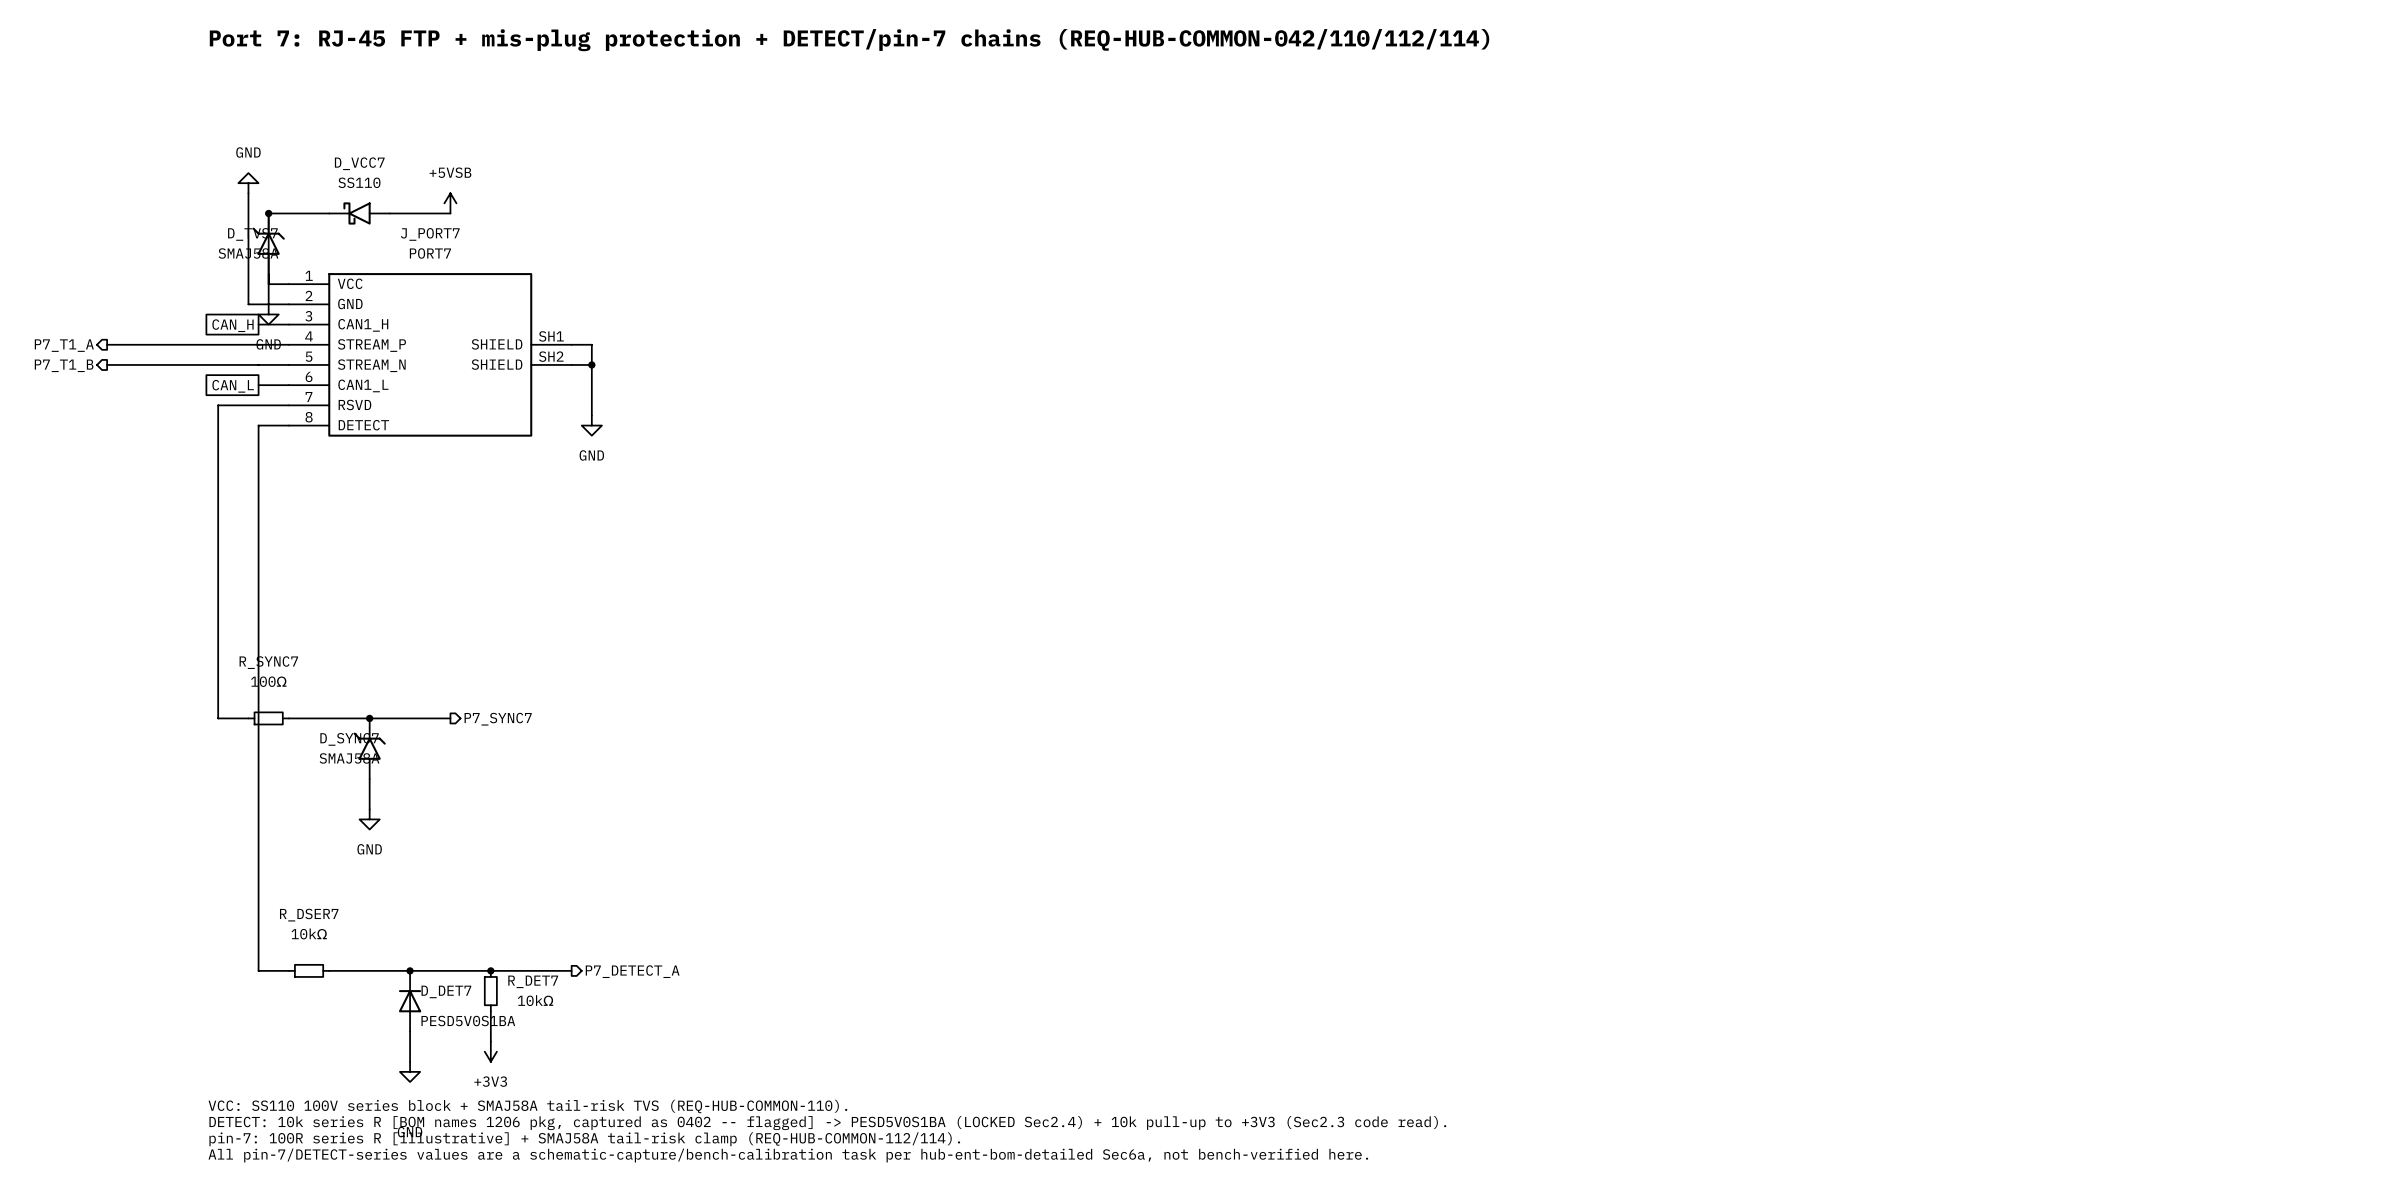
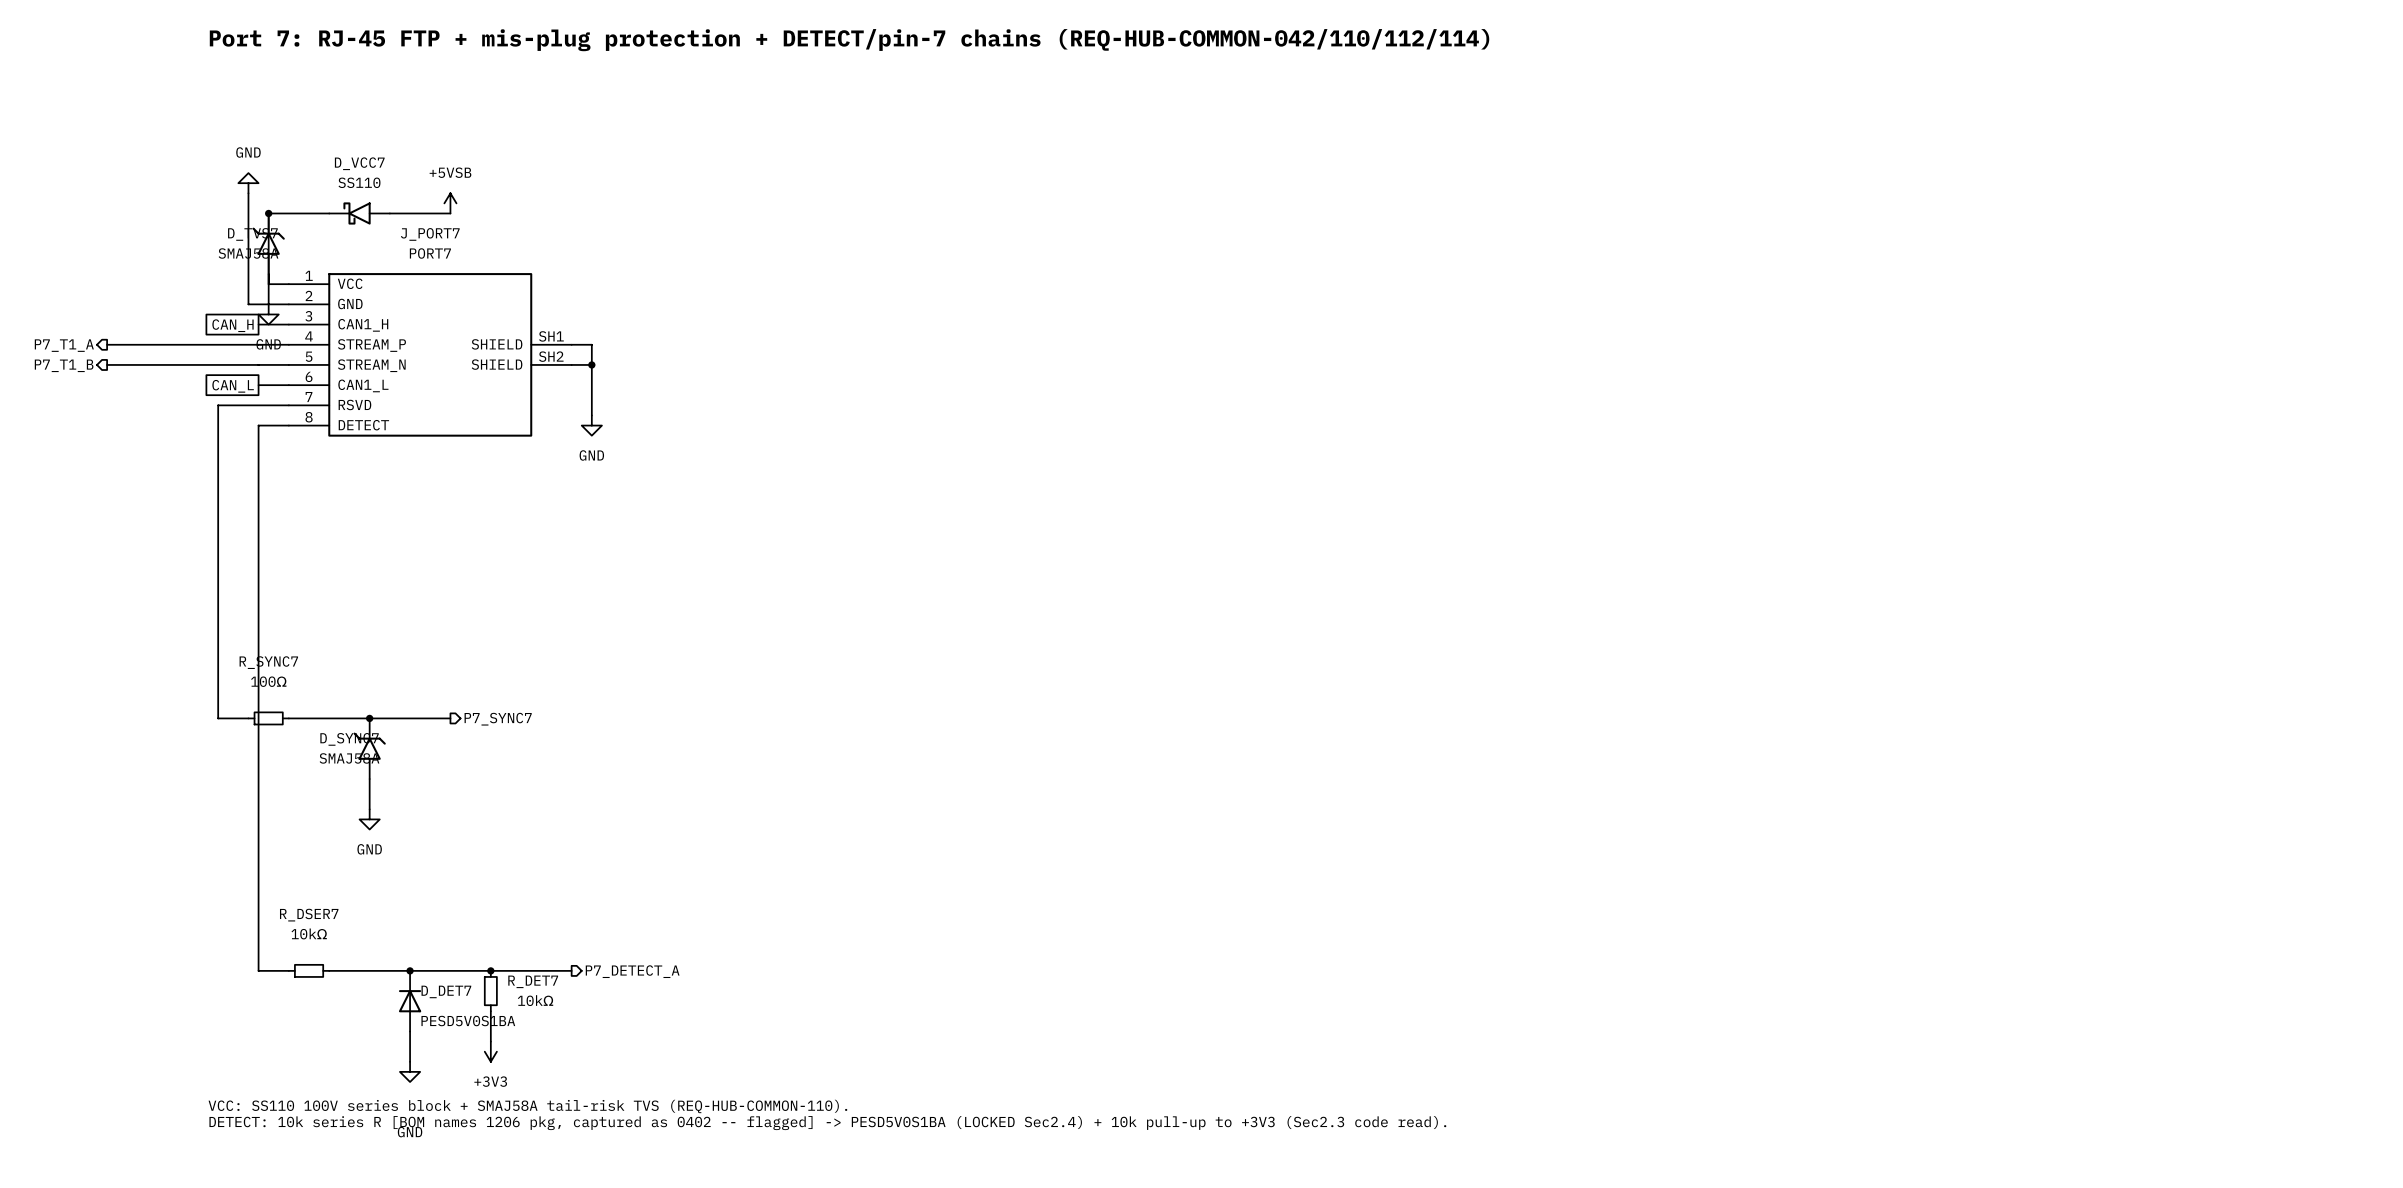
text: pin-7: 100R series R [illustrative] + SMAJ58A tail-risk clamp (REQ-HUB-COMMON-112/114). (584, 1139) -> none
text: All pin-7/DETECT-series values are a schematic-capture/bench-calibration task per hub-ent-bom-detailed Sec6a, not bench-verified here. (788, 1155) -> none

